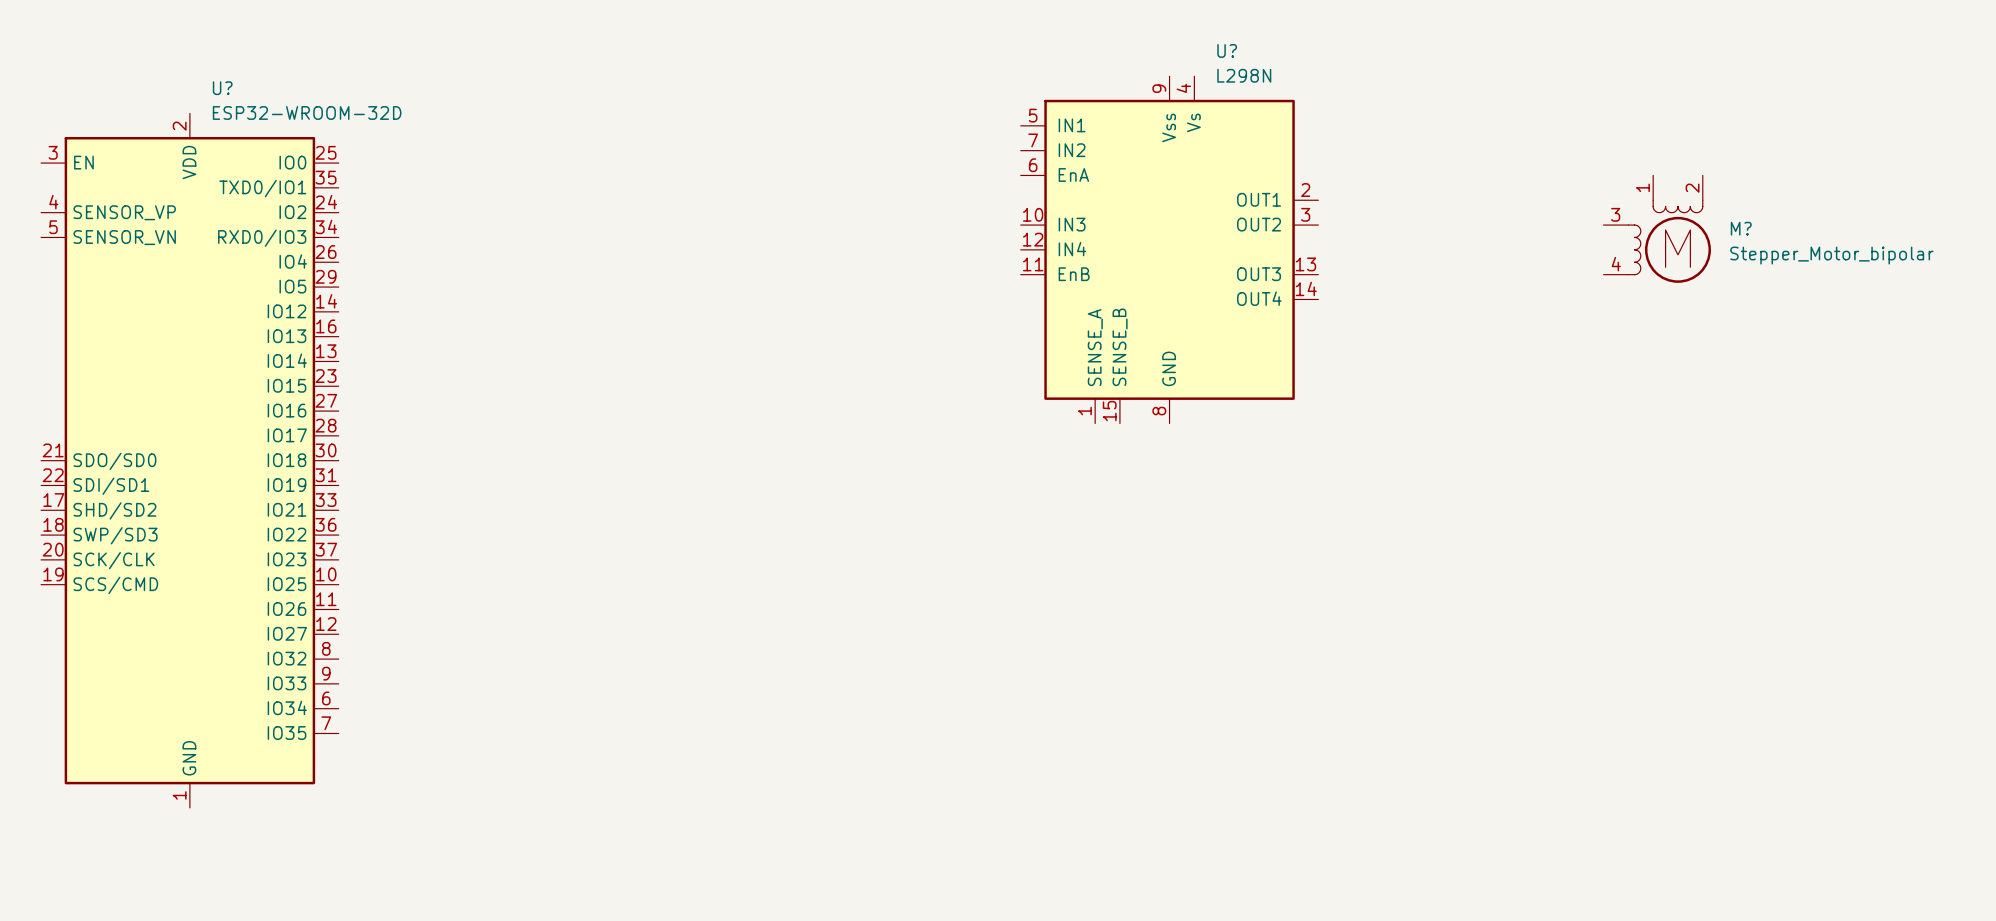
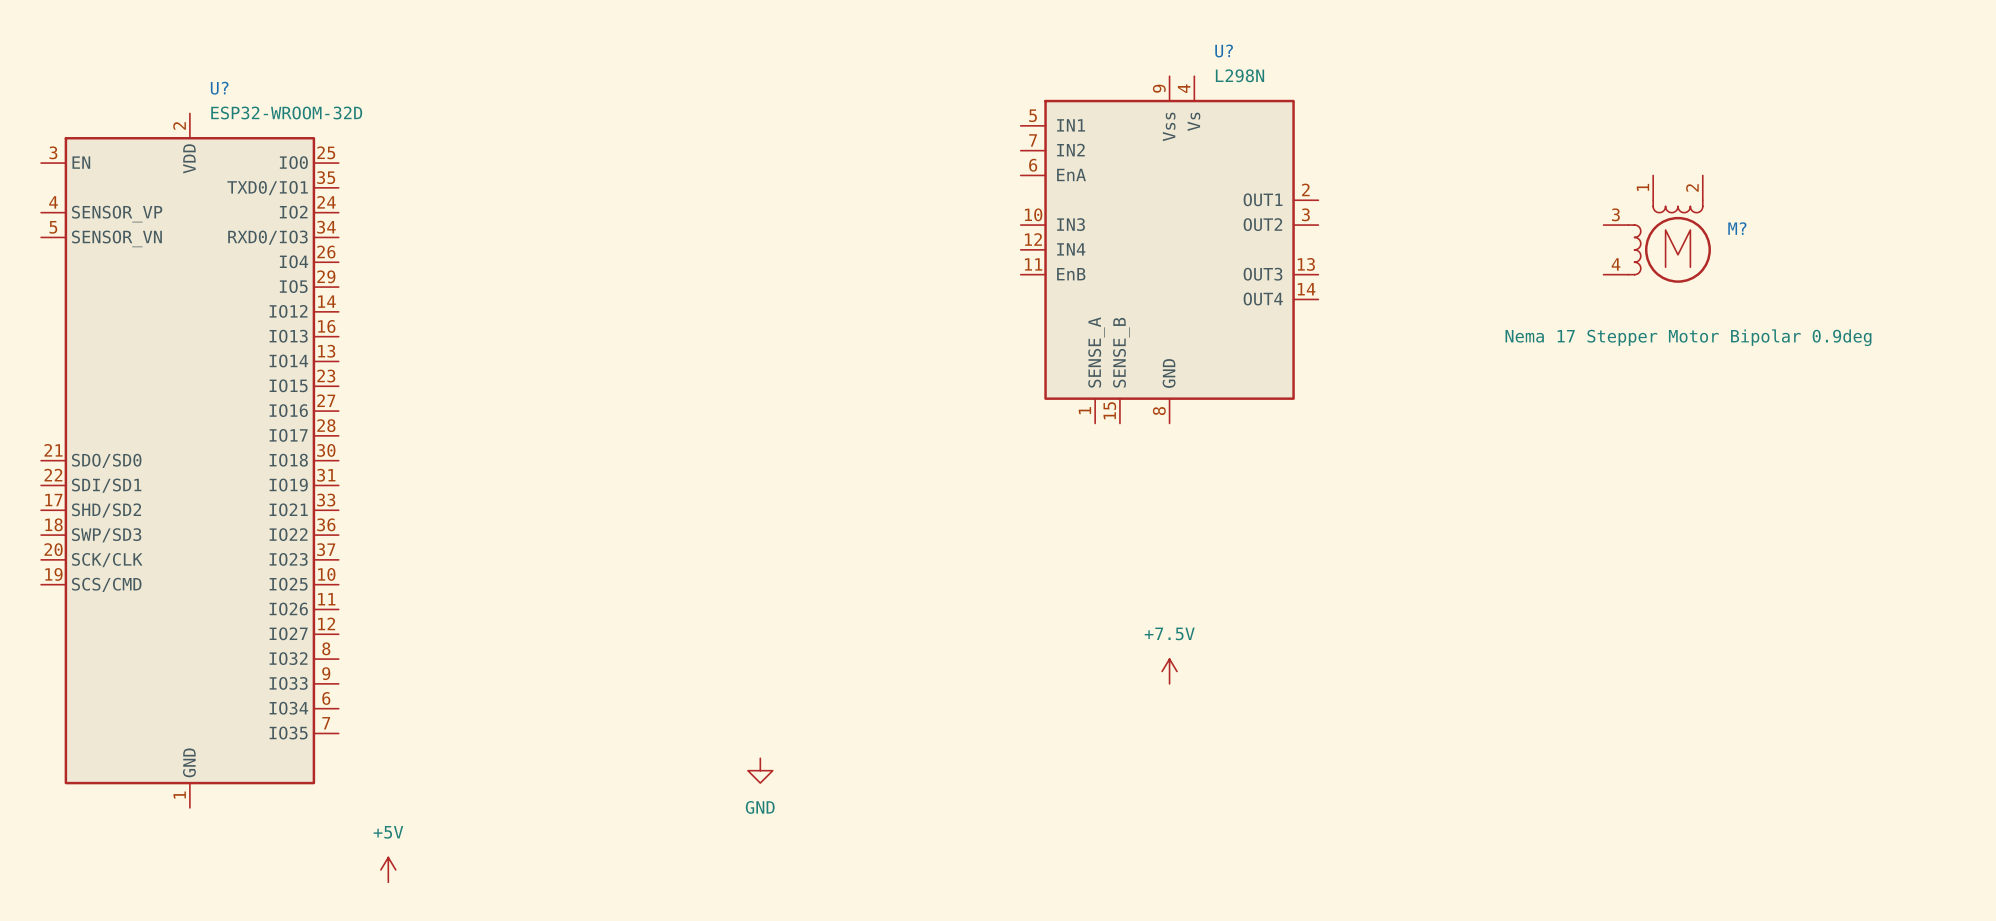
M? value: Stepper_Motor_bipolar (1831, 255) -> Nema 17 Stepper Motor Bipolar 0.9deg (1688, 337)
power symbol: none -> +7.5V (1169, 671)
power symbol: none -> GND (760, 770)
power symbol: none -> +5V (388, 869)

